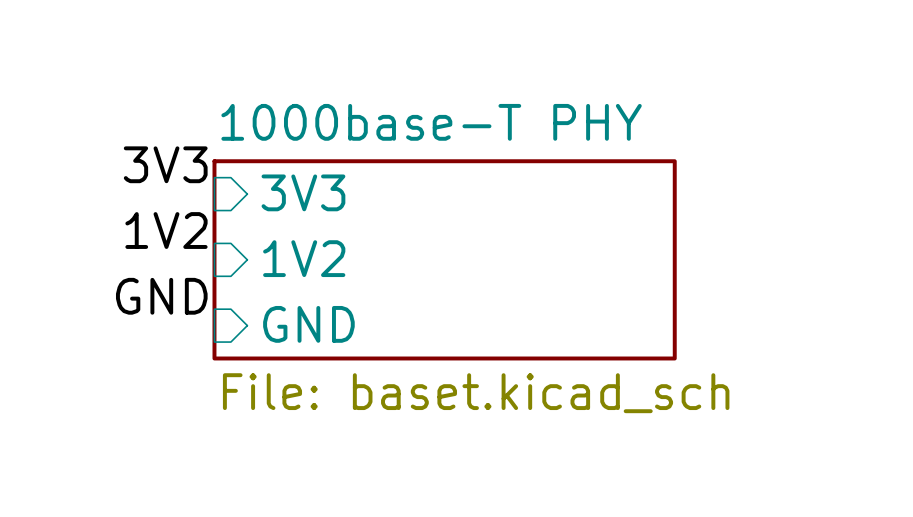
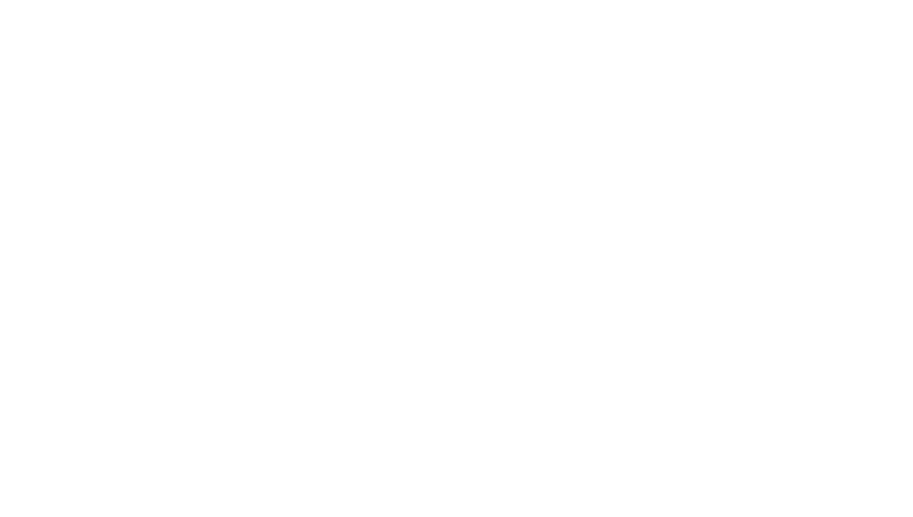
label: 3V3 (165, 164) -> none
sheet pin: 3V3 (303, 192) -> none
label: 1V2 (166, 230) -> none
sheet pin: 1V2 (304, 258) -> none
sheet 1000base-T PHY: File: baset.kicad_sch (444, 259) -> none
label: GND (161, 296) -> none
sheet pin: GND (308, 324) -> none

